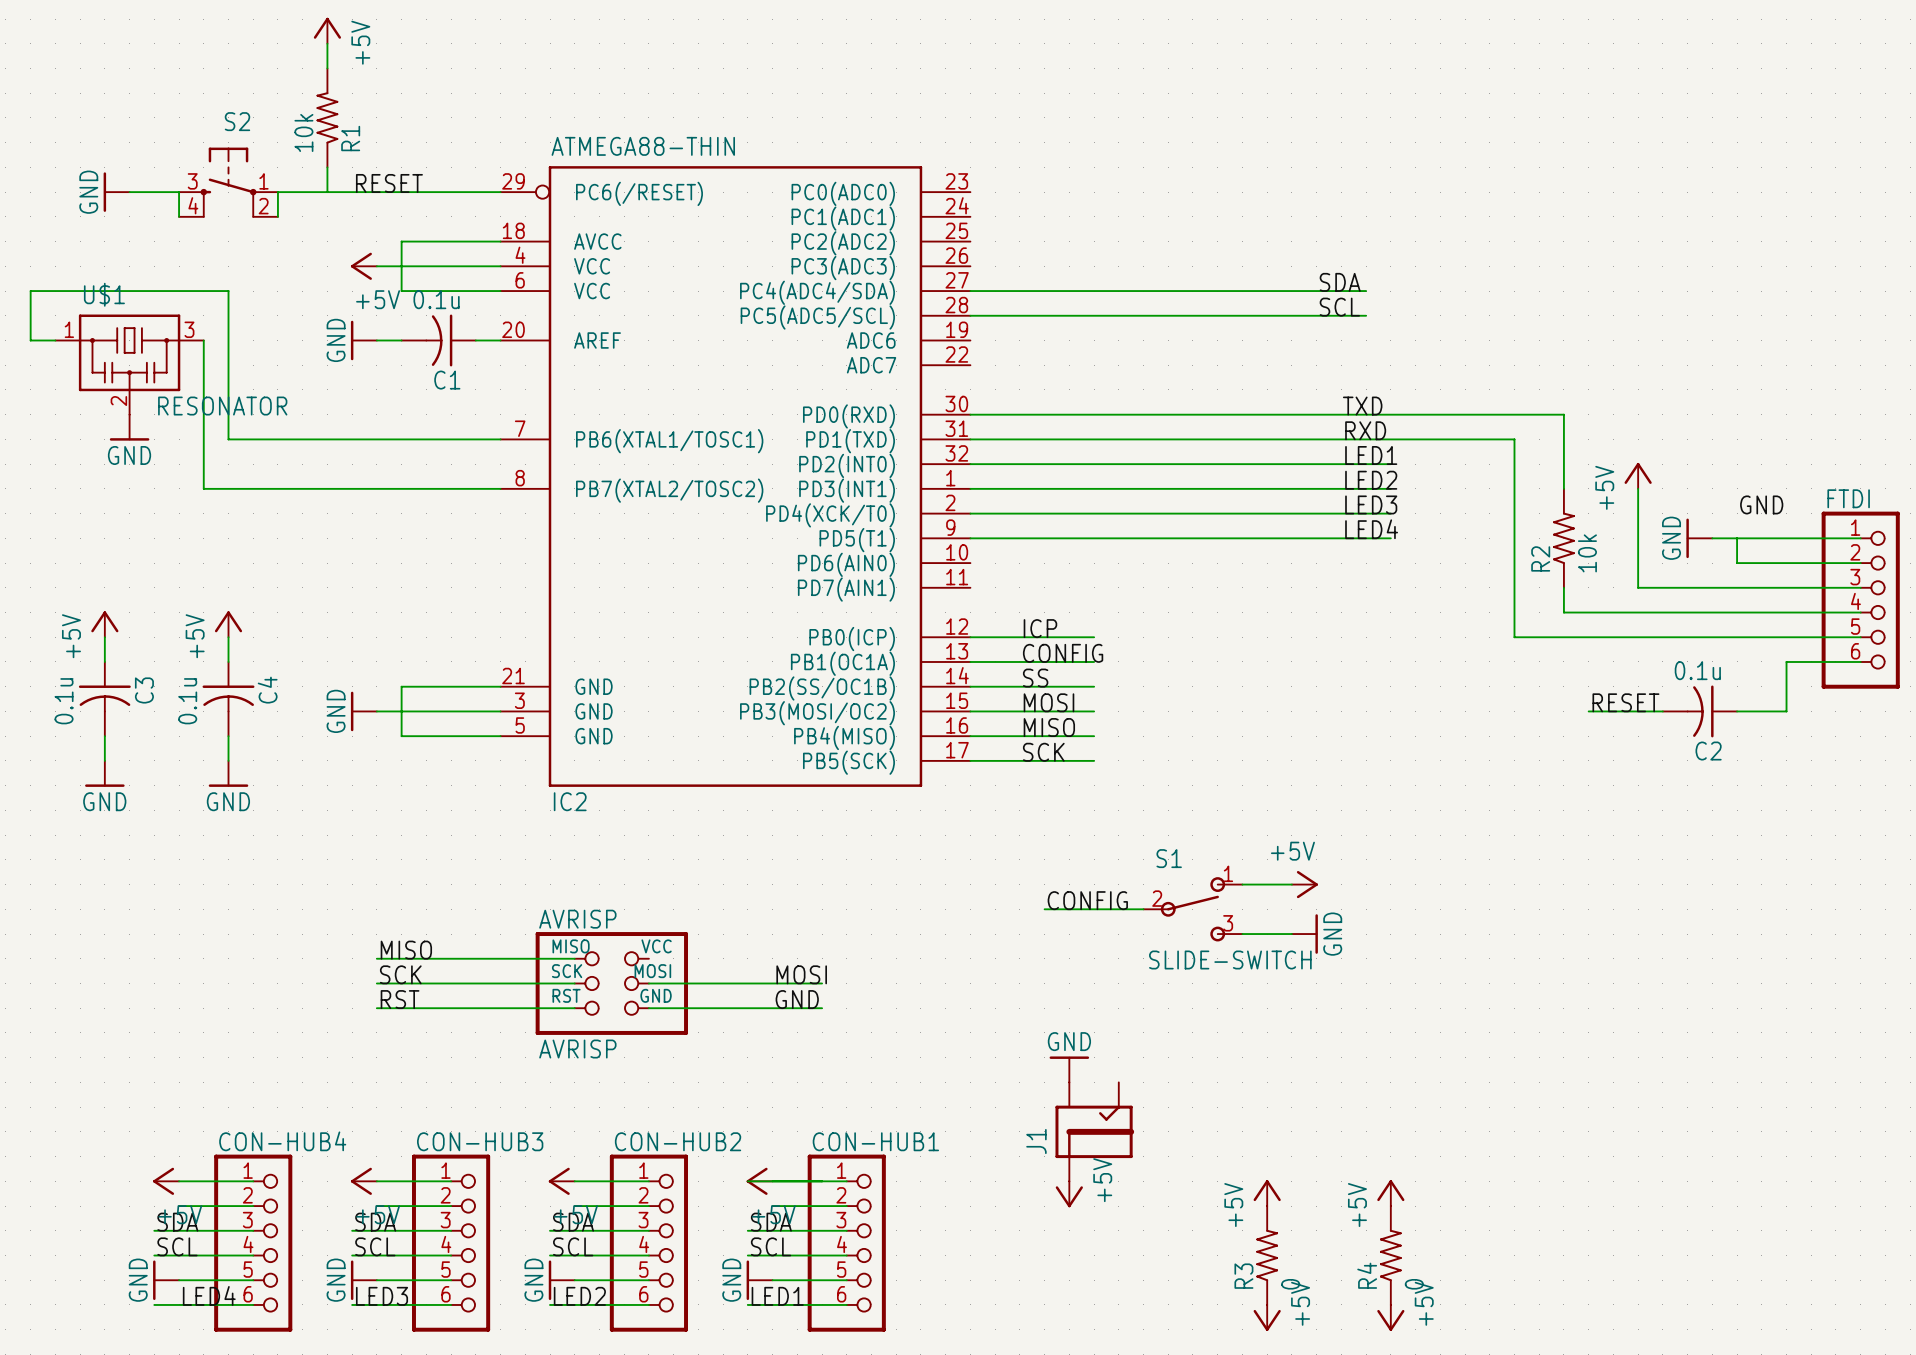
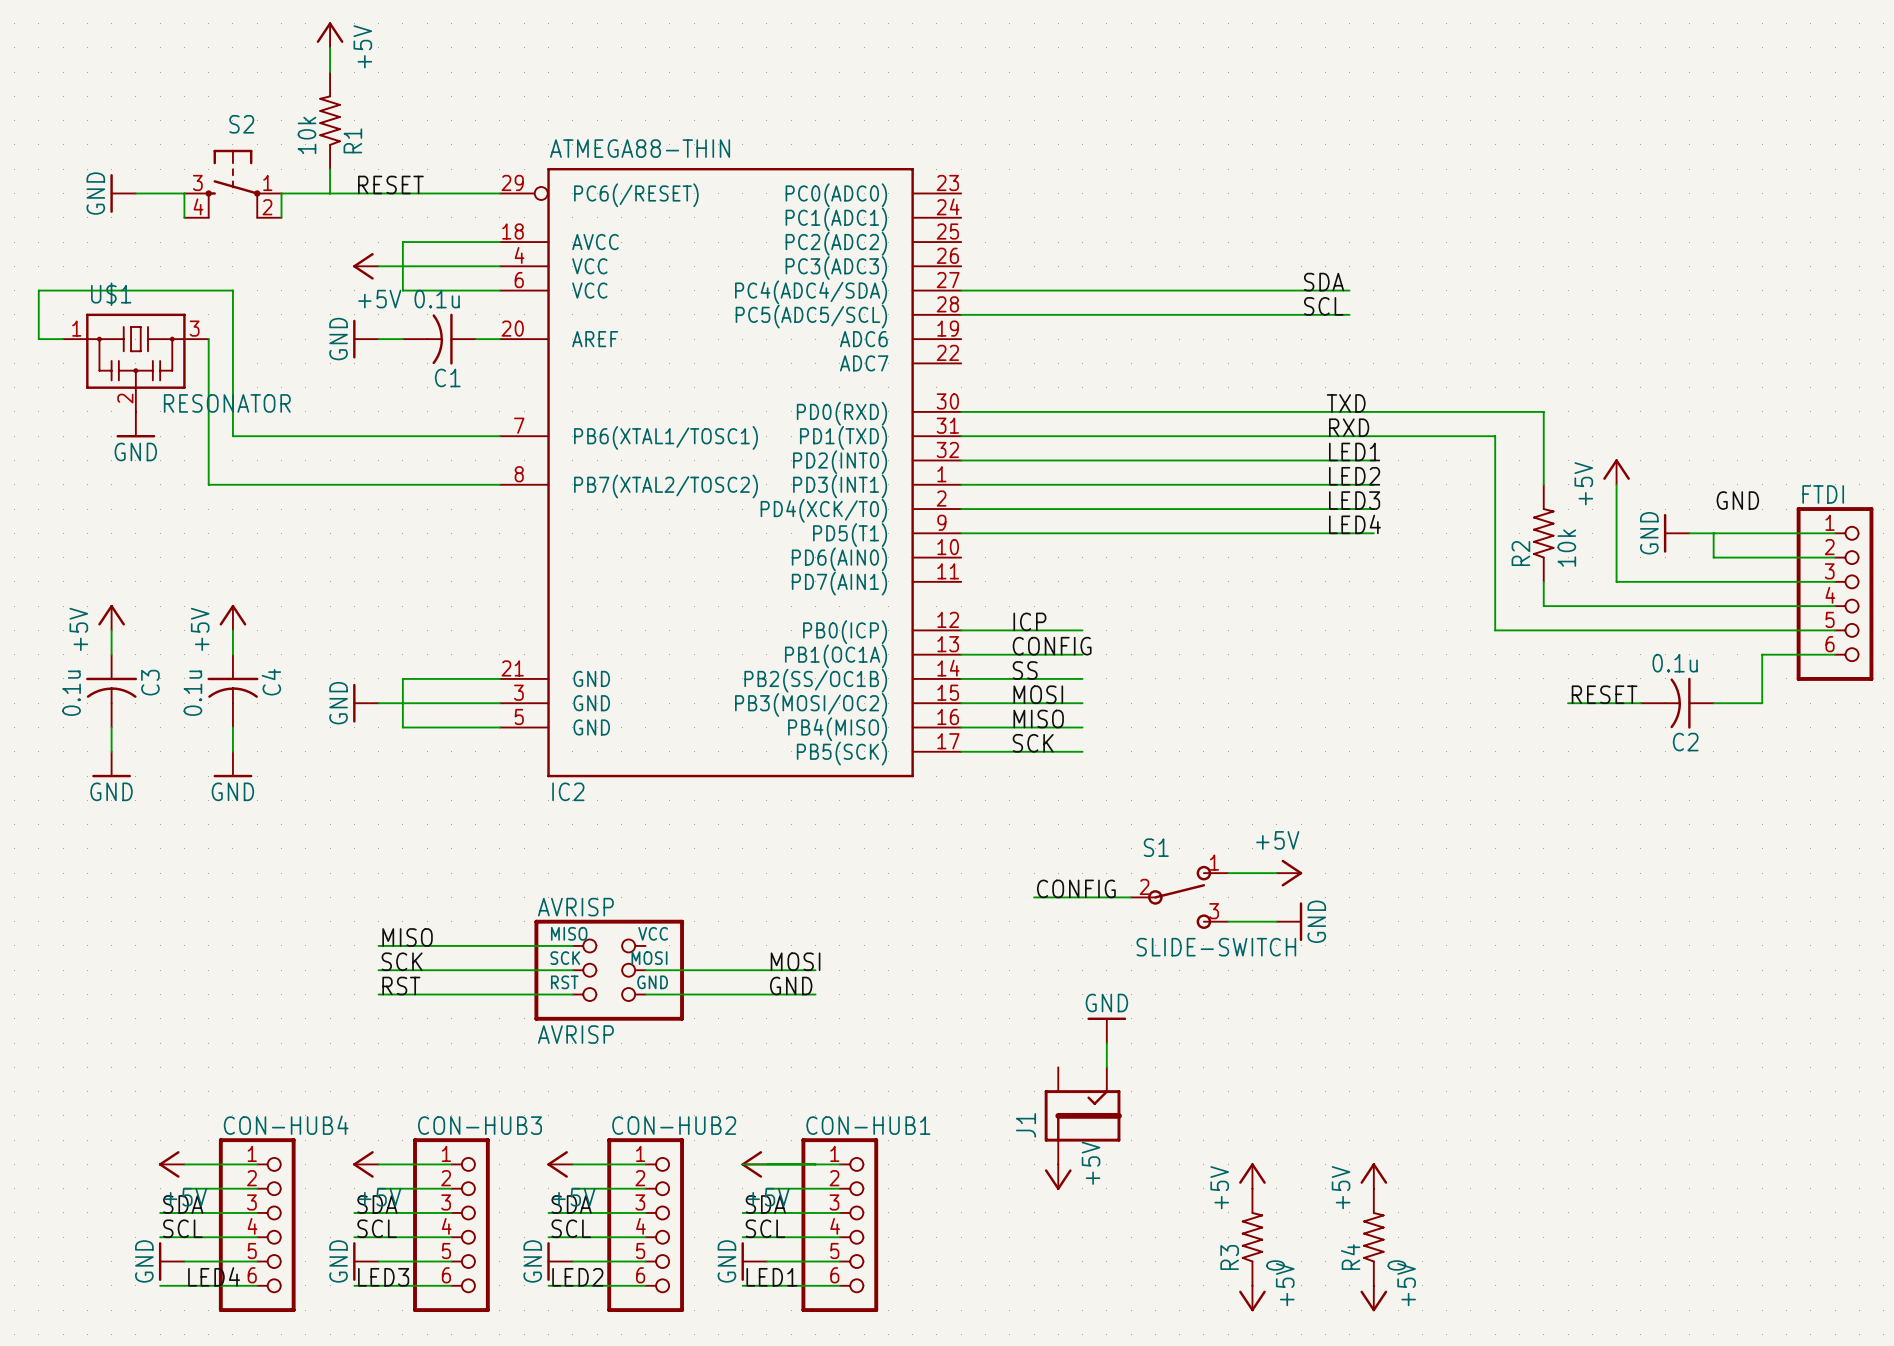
wire: none -> (1106, 1043) (1106, 1067)
power symbol position: GND (1069, 1069) -> GND (1106, 1030)

